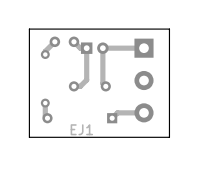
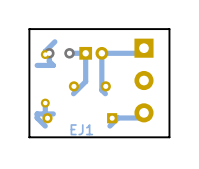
via: (54, 41) -> none
track: (73, 41) (80, 48) (86, 48) (86, 80) (80, 86) (73, 86) -> none
via: (73, 41) -> none
part footprint: [80, 42, 109, 54] -> [79, 46, 109, 60]
track: (143, 48) (102, 48) (102, 83) (105, 86) -> none
track: none -> (49, 53) (49, 61) (53, 65) (37, 65)
via: none -> (49, 53)
track: none -> (69, 53) (85, 53) (85, 81) (73, 93)
via: none -> (69, 53)
track: none -> (142, 53) (101, 53) (101, 90) (105, 93)
track: (143, 112) (117, 112) (112, 118) -> none
track: none -> (53, 113) (37, 113) (37, 117) (45, 126)
track: none -> (142, 117) (118, 117) (109, 126)

